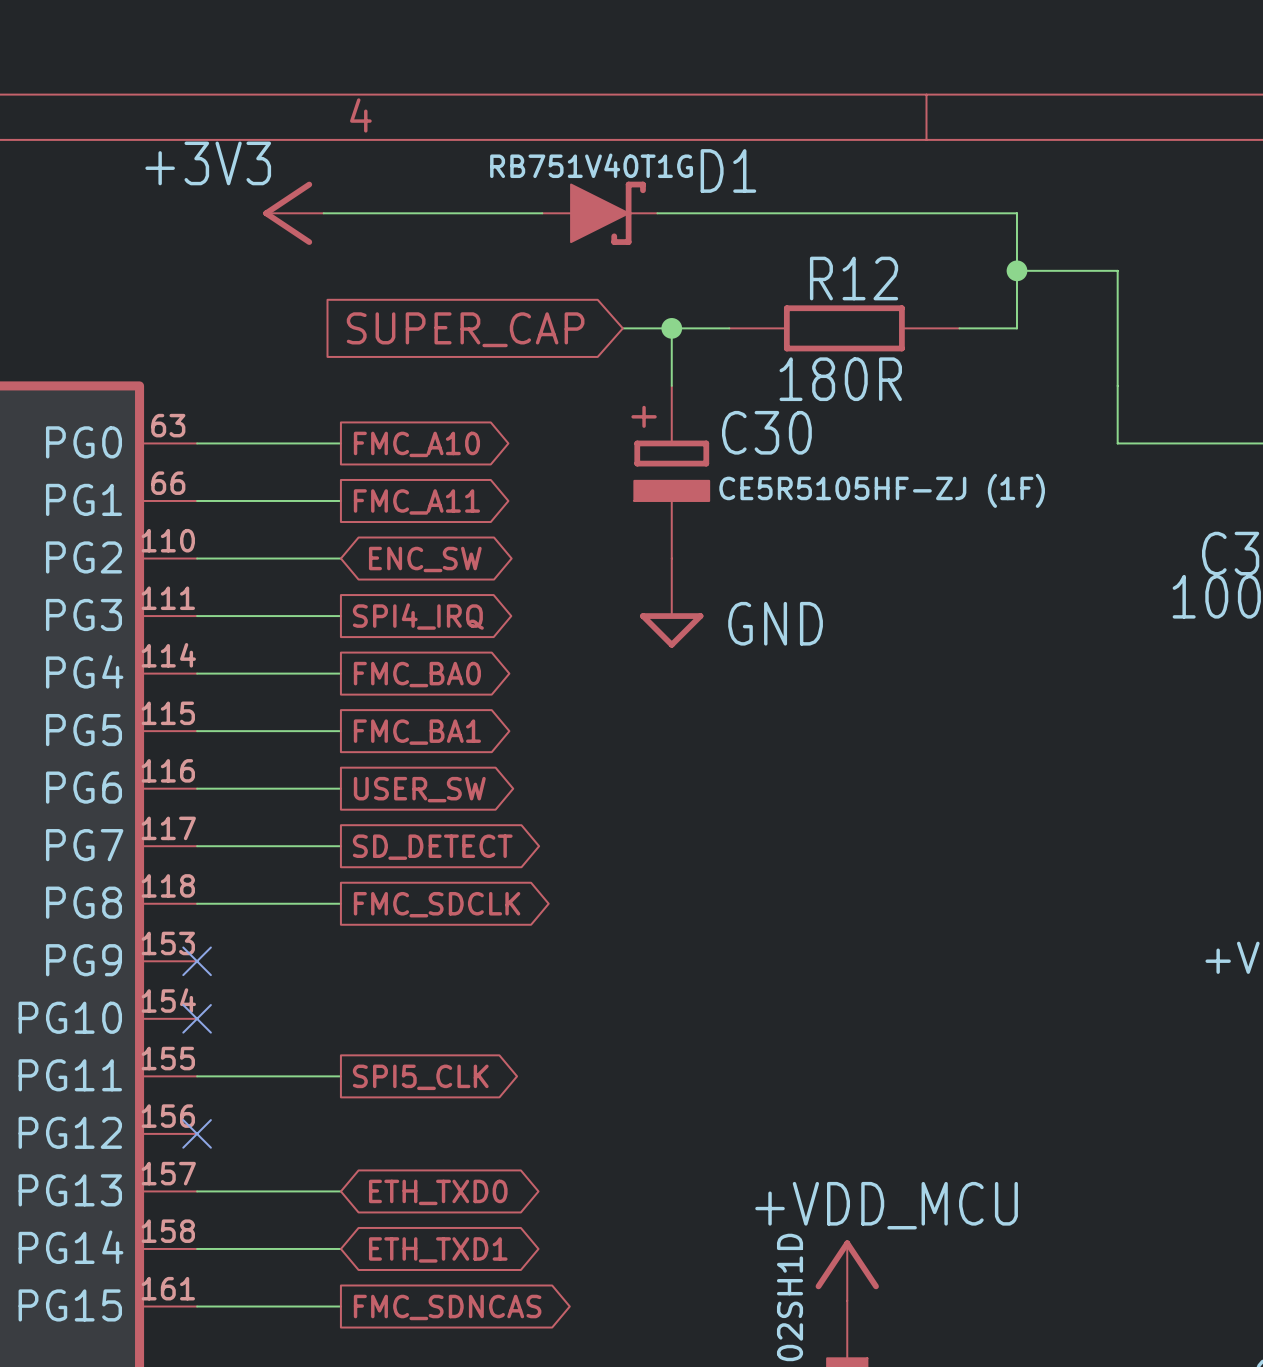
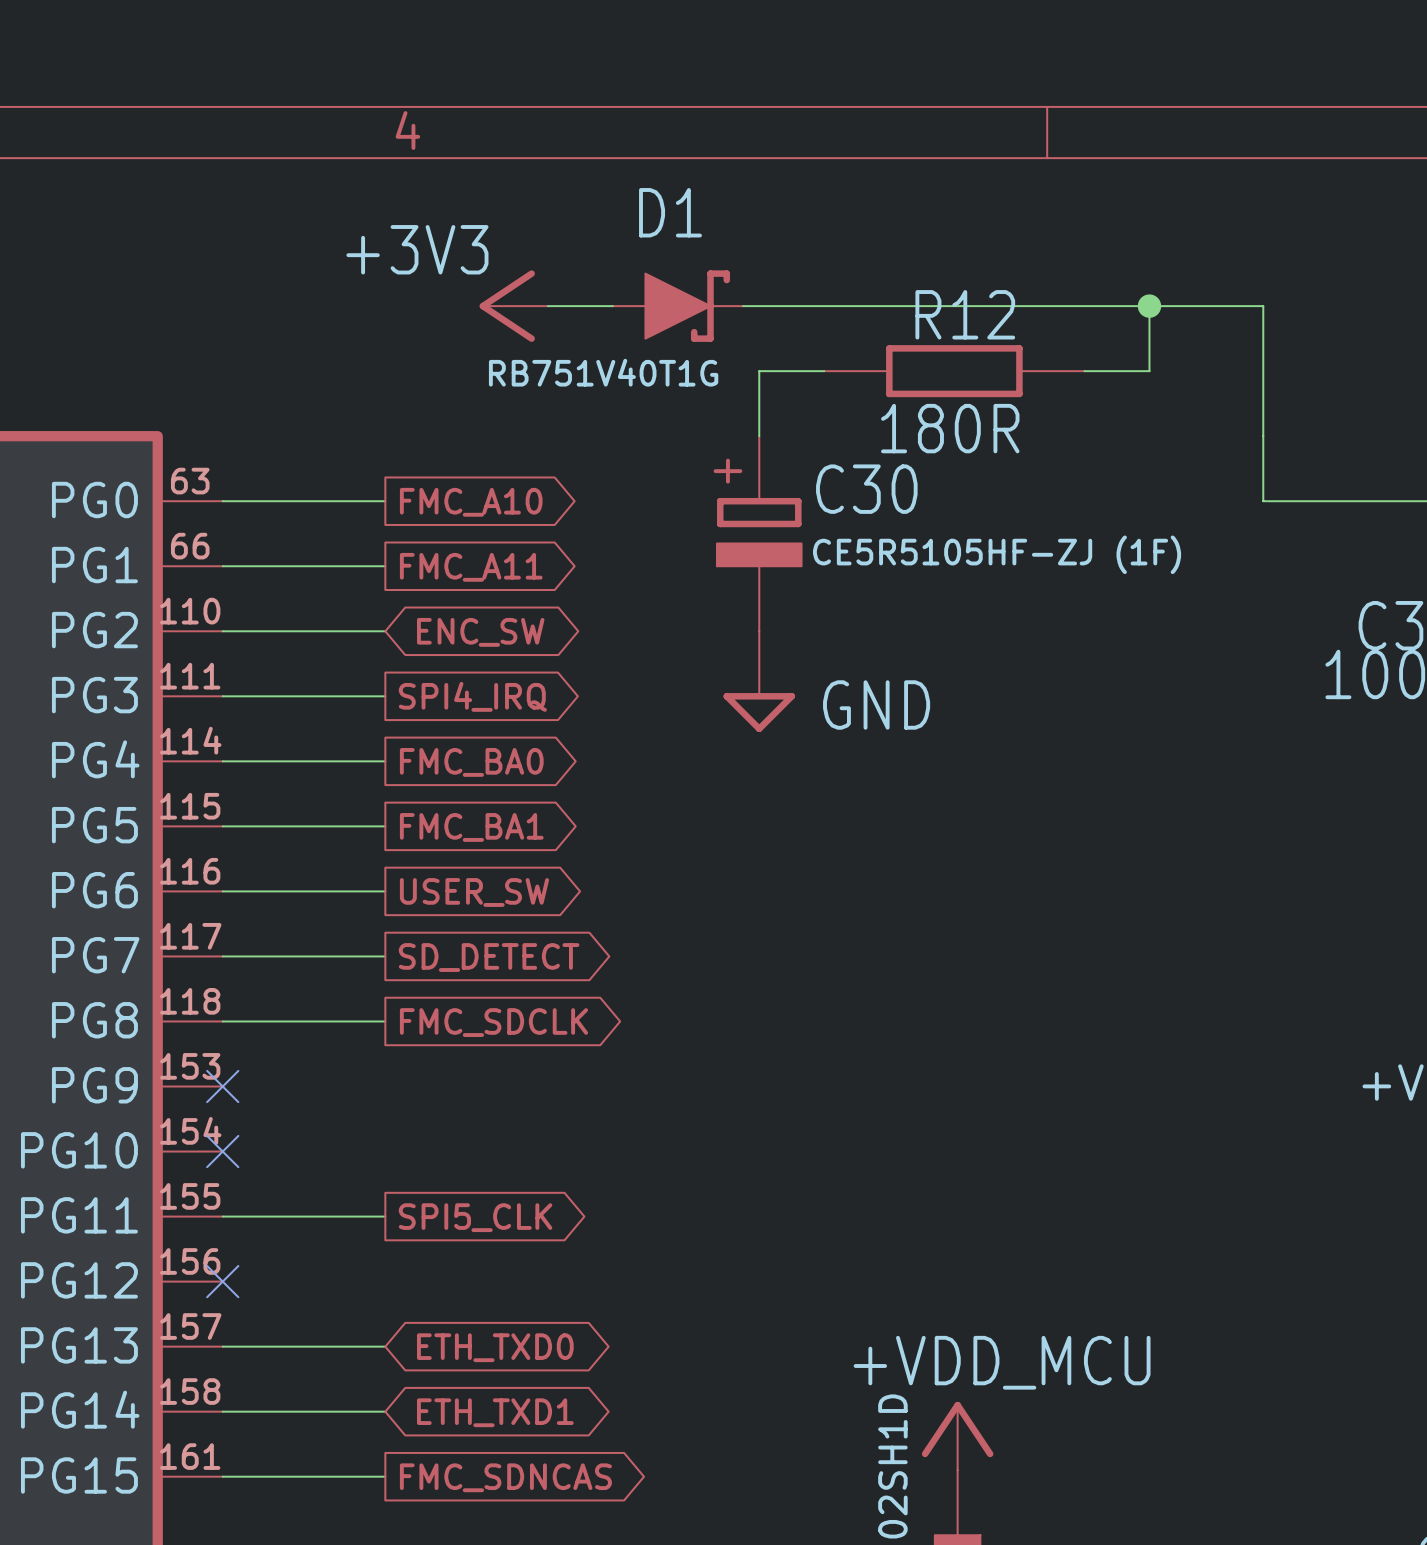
D1 value position: RB751V40T1G (591, 165) -> RB751V40T1G (603, 372)
D1 name position: D1 (728, 170) -> D1 (670, 212)
power symbol position: +3V3 (293, 213) -> +3V3 (513, 306)
wire: (323, 213) (542, 213) -> none
D1 position: (599, 213) -> (677, 306)
wire: (657, 213) (1016, 213) (1016, 270) -> (743, 306) (1149, 306)
wire: none -> (547, 306) (612, 306)
wire: (622, 328) (671, 328) -> none
junction: (671, 328) -> none
global label: SUPER_CAP (465, 329) -> none

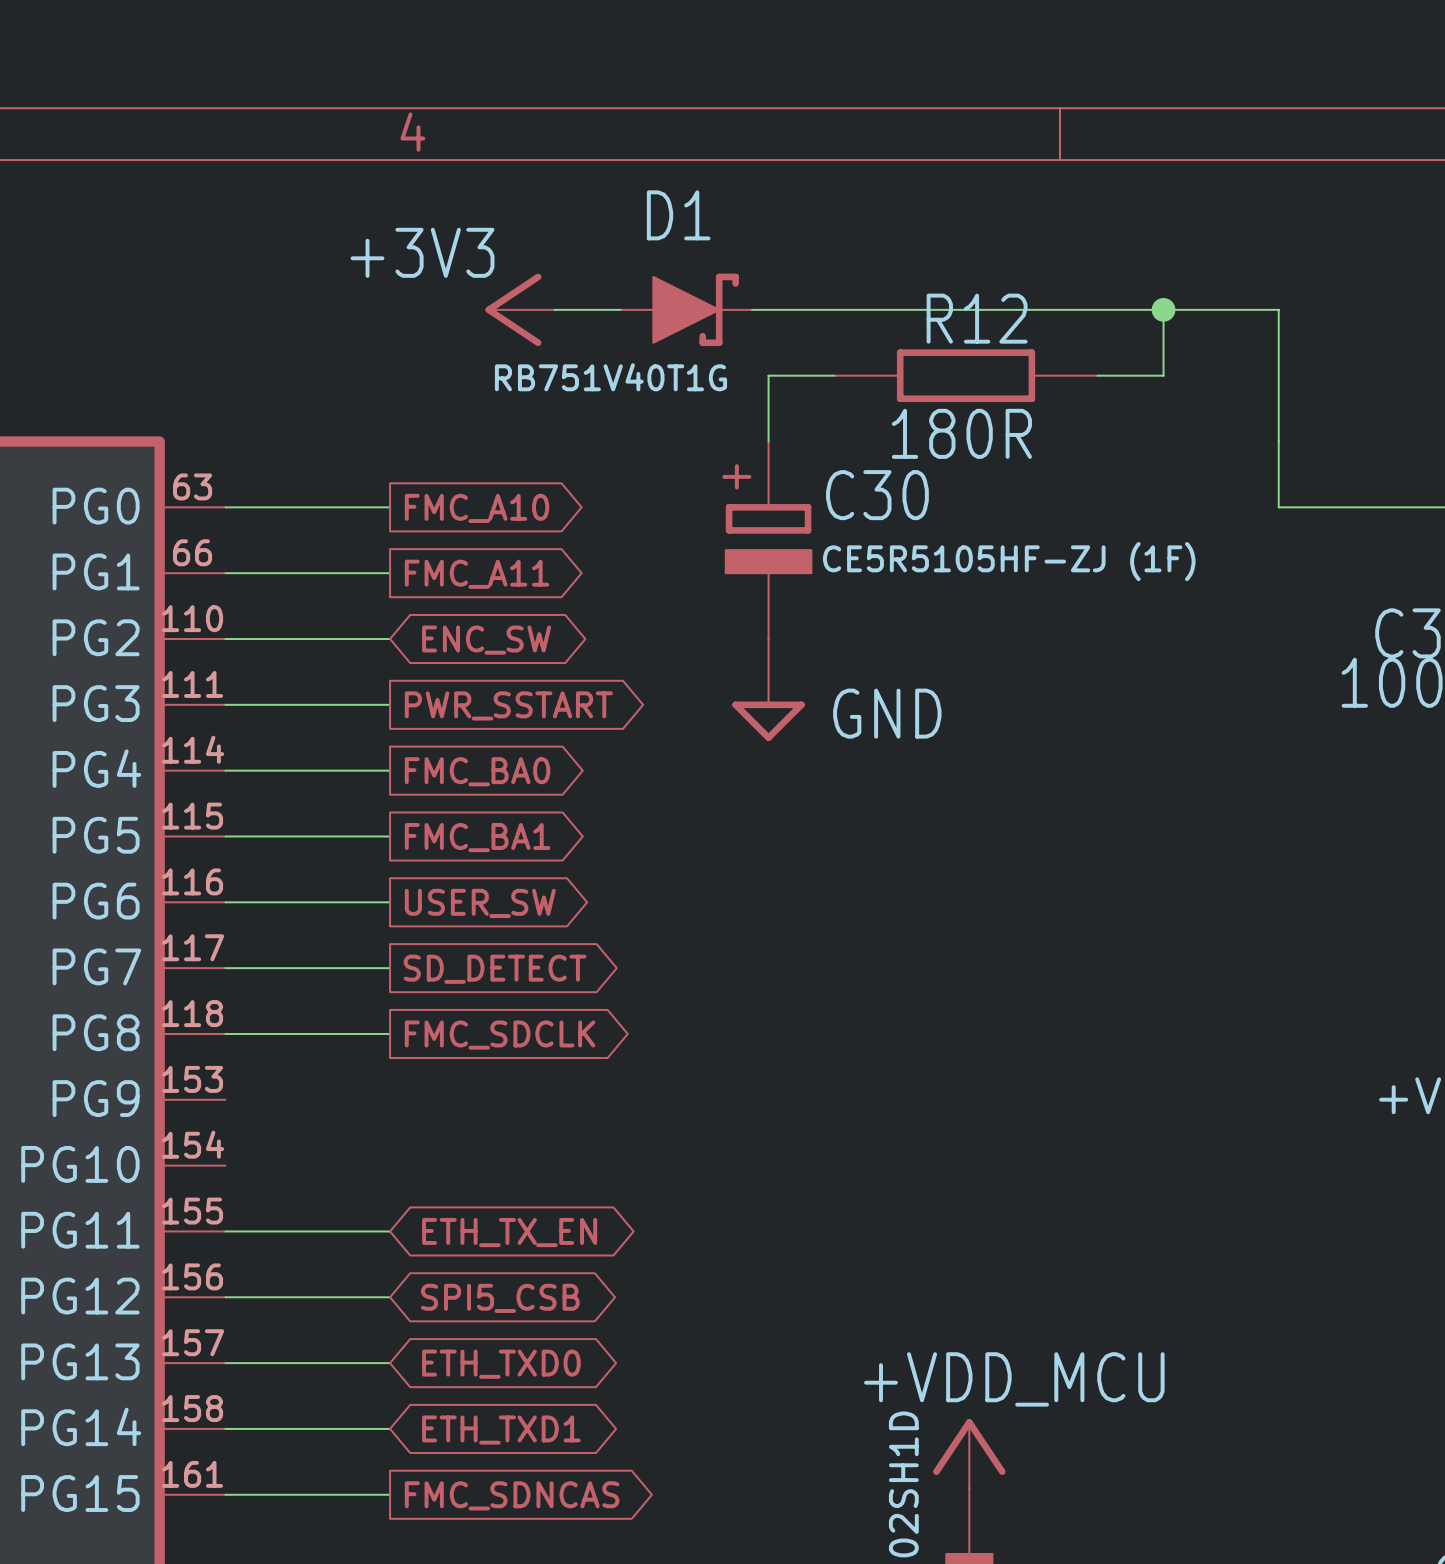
global label: SPI4_IRQ (472, 696) -> PWR_SSTART (508, 705)
no-connect mark: (222, 1086) -> none
no-connect mark: (222, 1151) -> none
global label shape: output (475, 1217) -> bidirectional (509, 1232)
global label: SPI5_CLK (475, 1217) -> ETH_TX_EN (509, 1232)
wire: none -> (225, 1297) (390, 1297)
no-connect mark: (222, 1281) -> none
global label: none -> SPI5_CSB (500, 1298)

